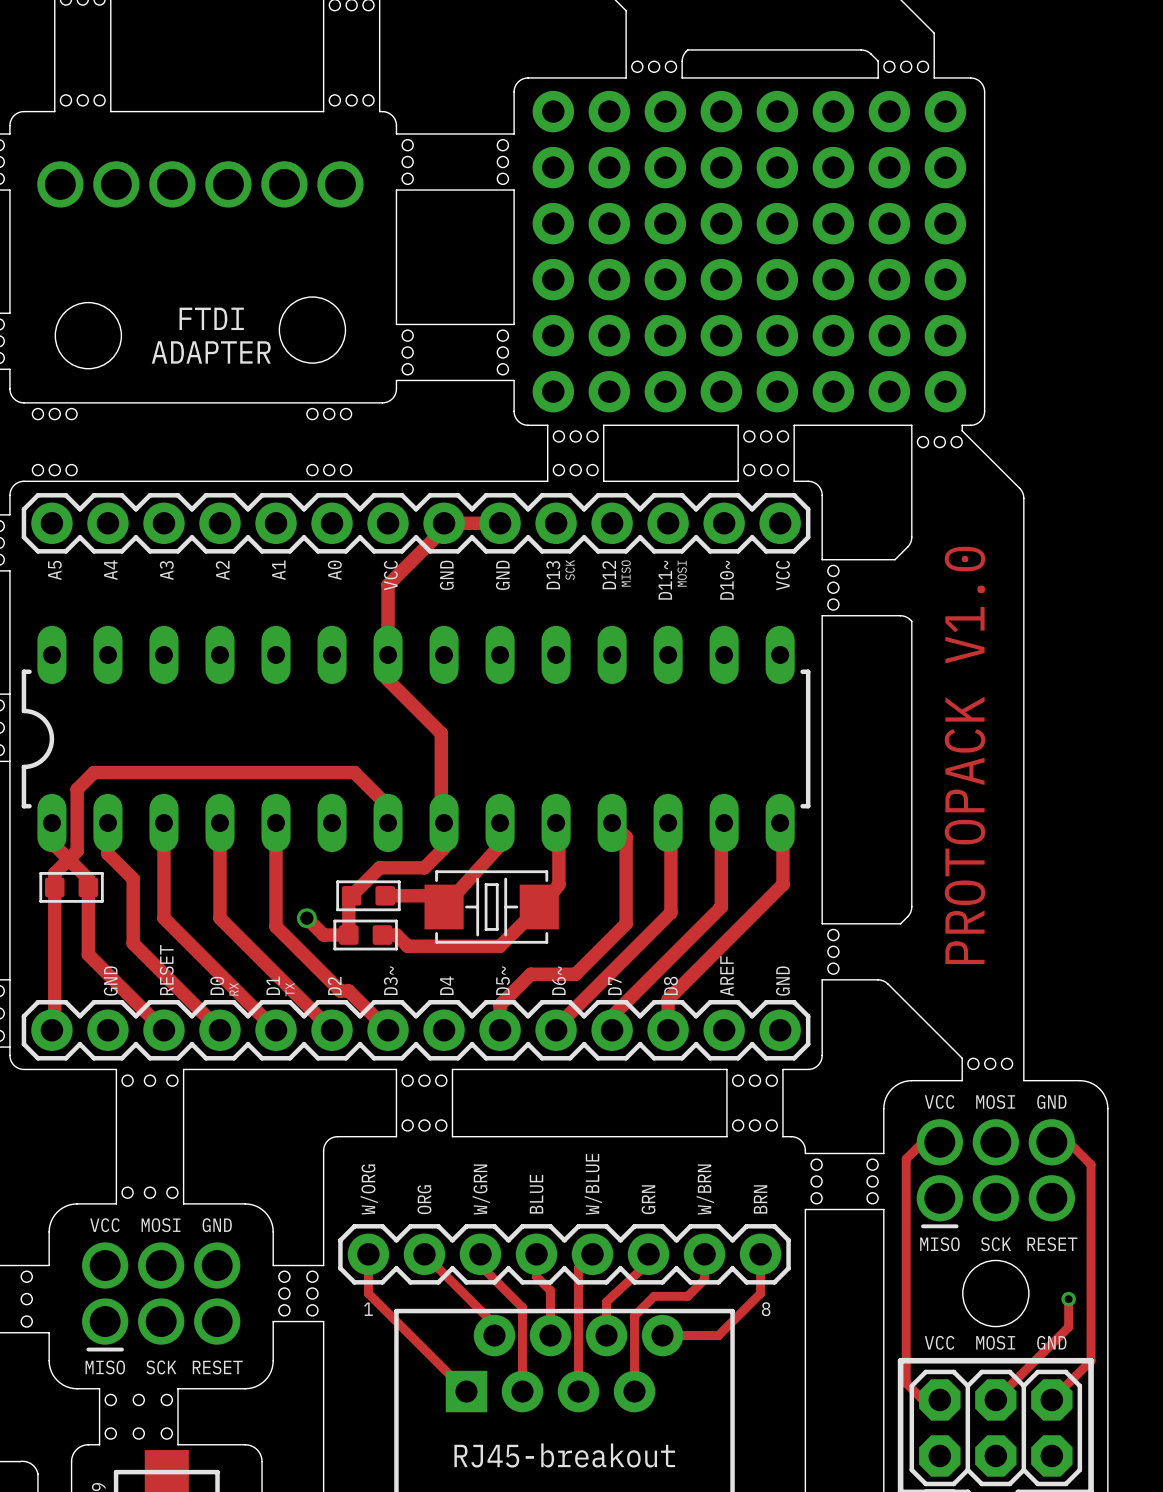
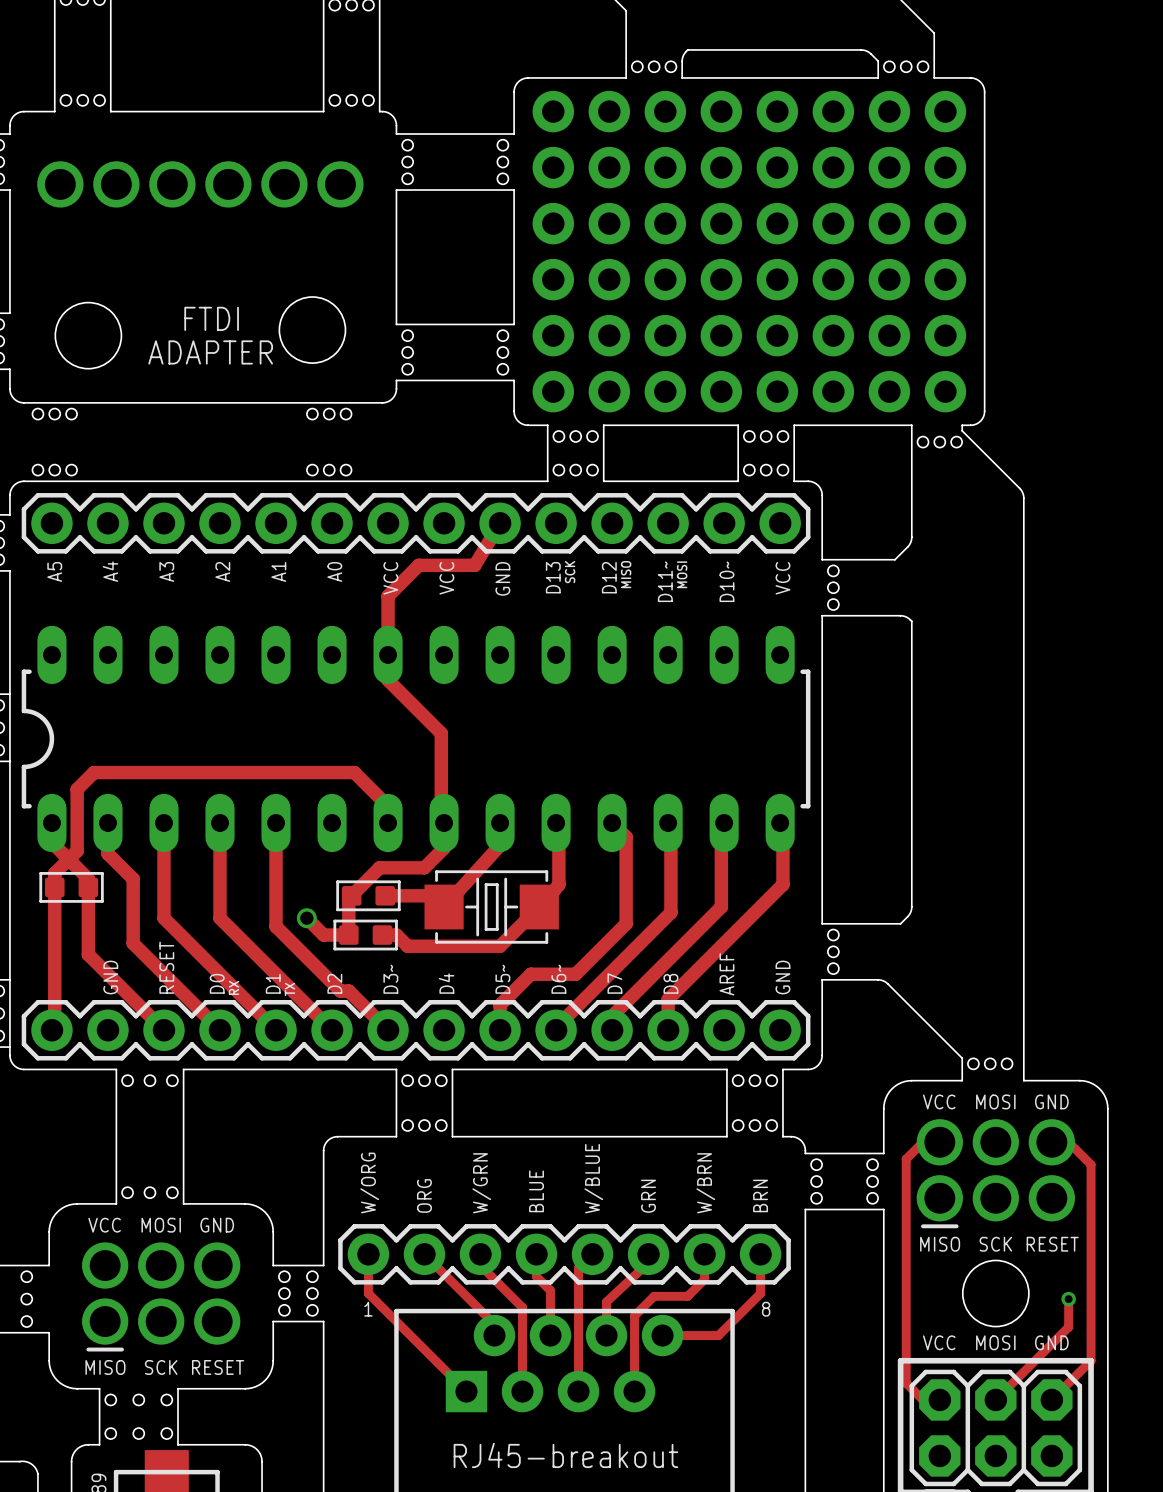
track: (500, 523) (444, 523) (441, 531) (388, 584) (388, 596) -> (500, 523) (474, 565) (418, 565) (388, 596)
text: GND (446, 575) -> VCC (446, 578)
text: PROTOPACK V1.0 (965, 755) -> none

